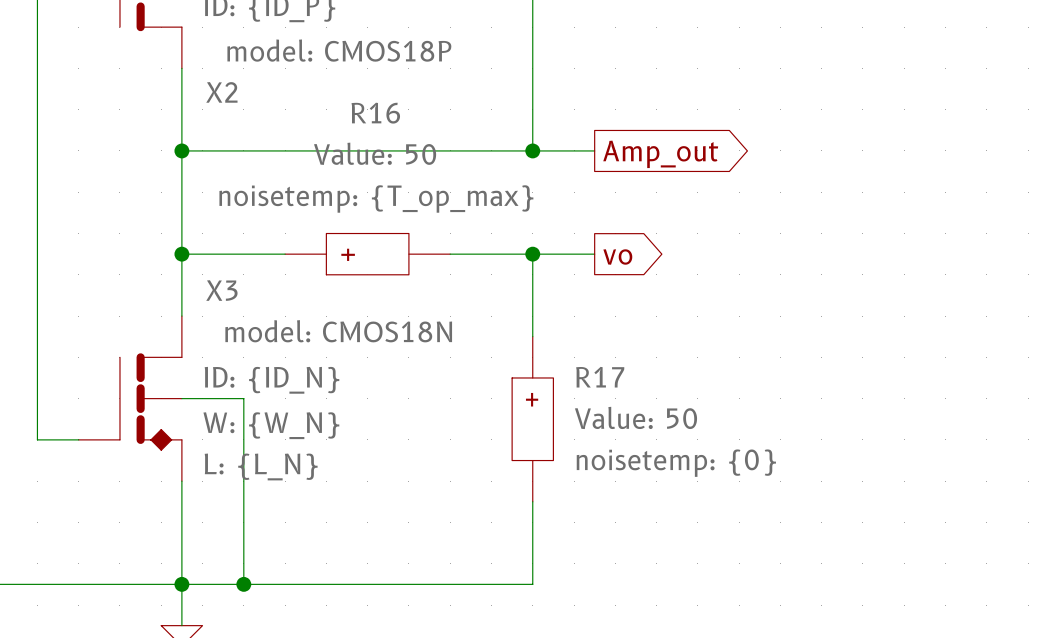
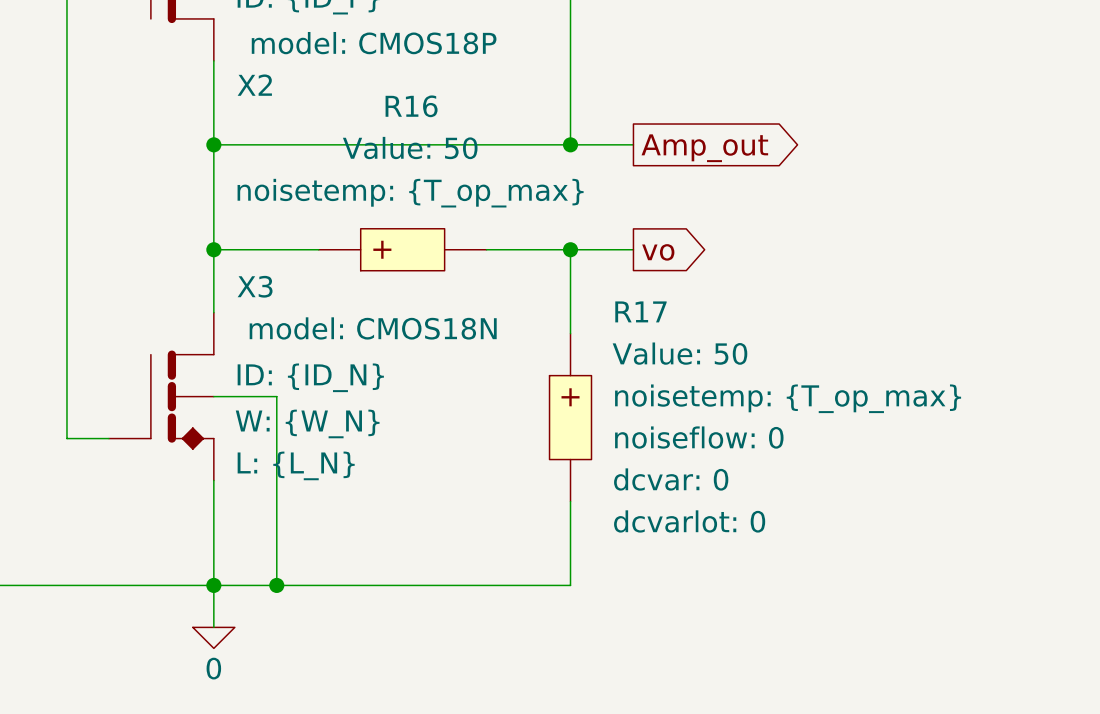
R17 name position: R17 (600, 377) -> R17 (640, 311)
R17 value position: Value: 50 (635, 417) -> Value: 50 (679, 353)
R17 text: none -> noiseflow: 0 (699, 437)
R17 text: noisetemp: {0} (676, 463) -> noisetemp: {T_op_max} (788, 398)
R17 text: none -> dcvar: 0 (671, 479)
R17 text: none -> dcvarlot: 0 (689, 521)

